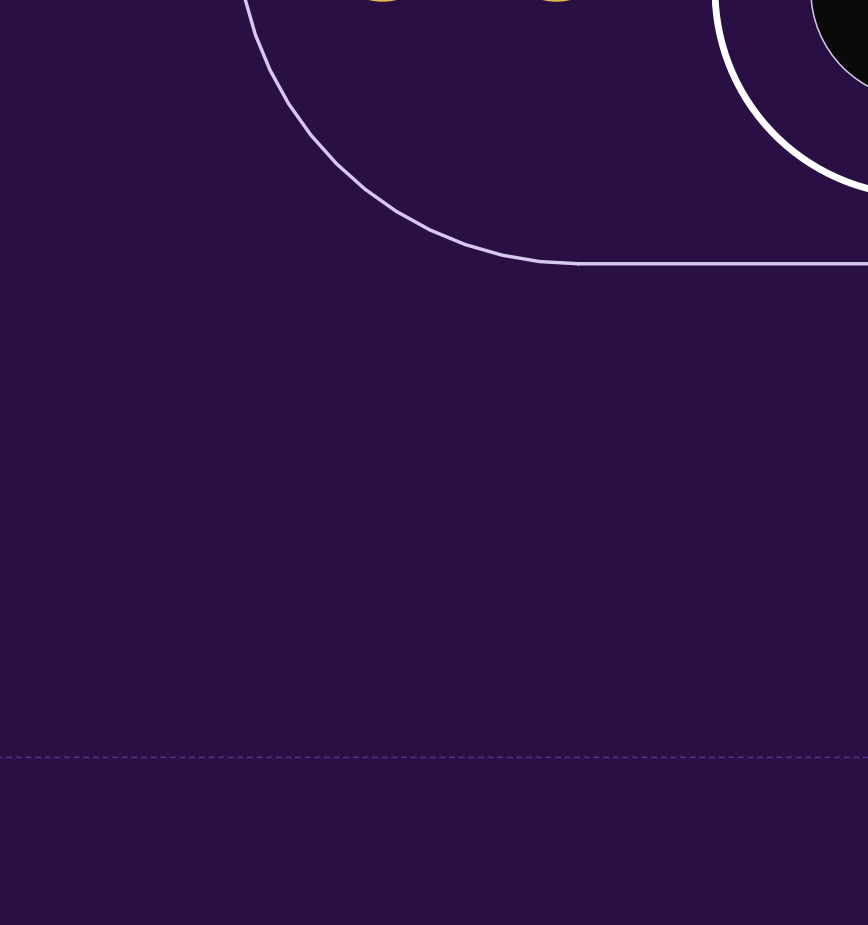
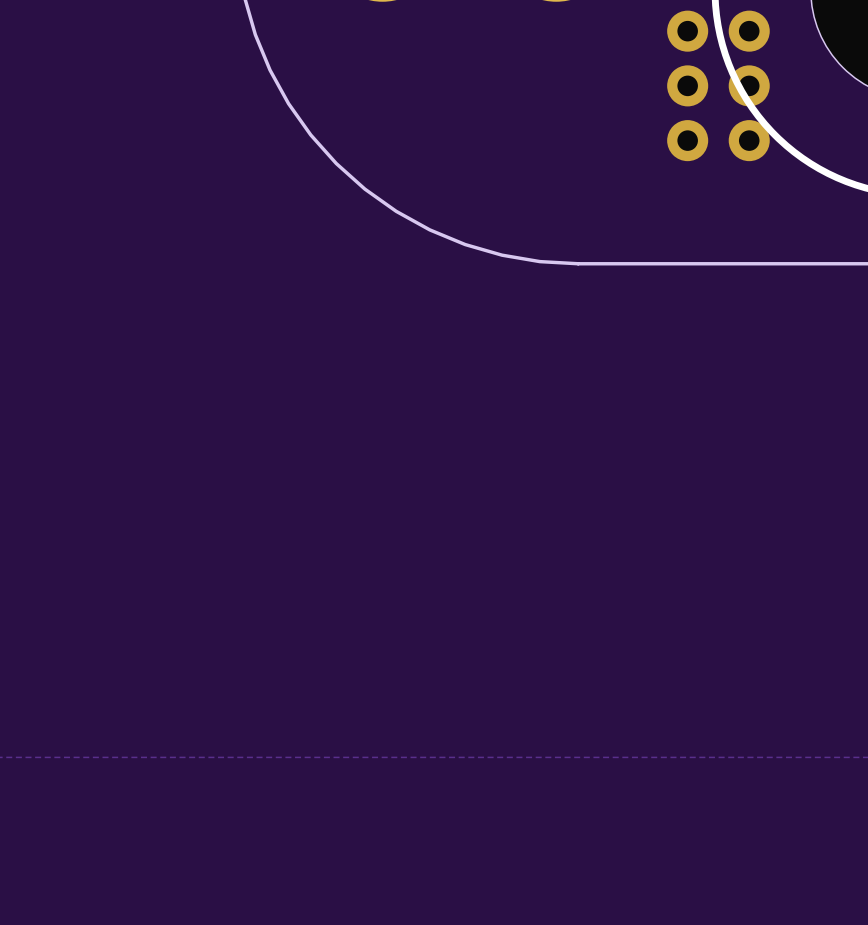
via: none -> (687, 31)
via: none -> (749, 31)
via: none -> (687, 85)
via: none -> (749, 85)
via: none -> (687, 140)
via: none -> (749, 140)

